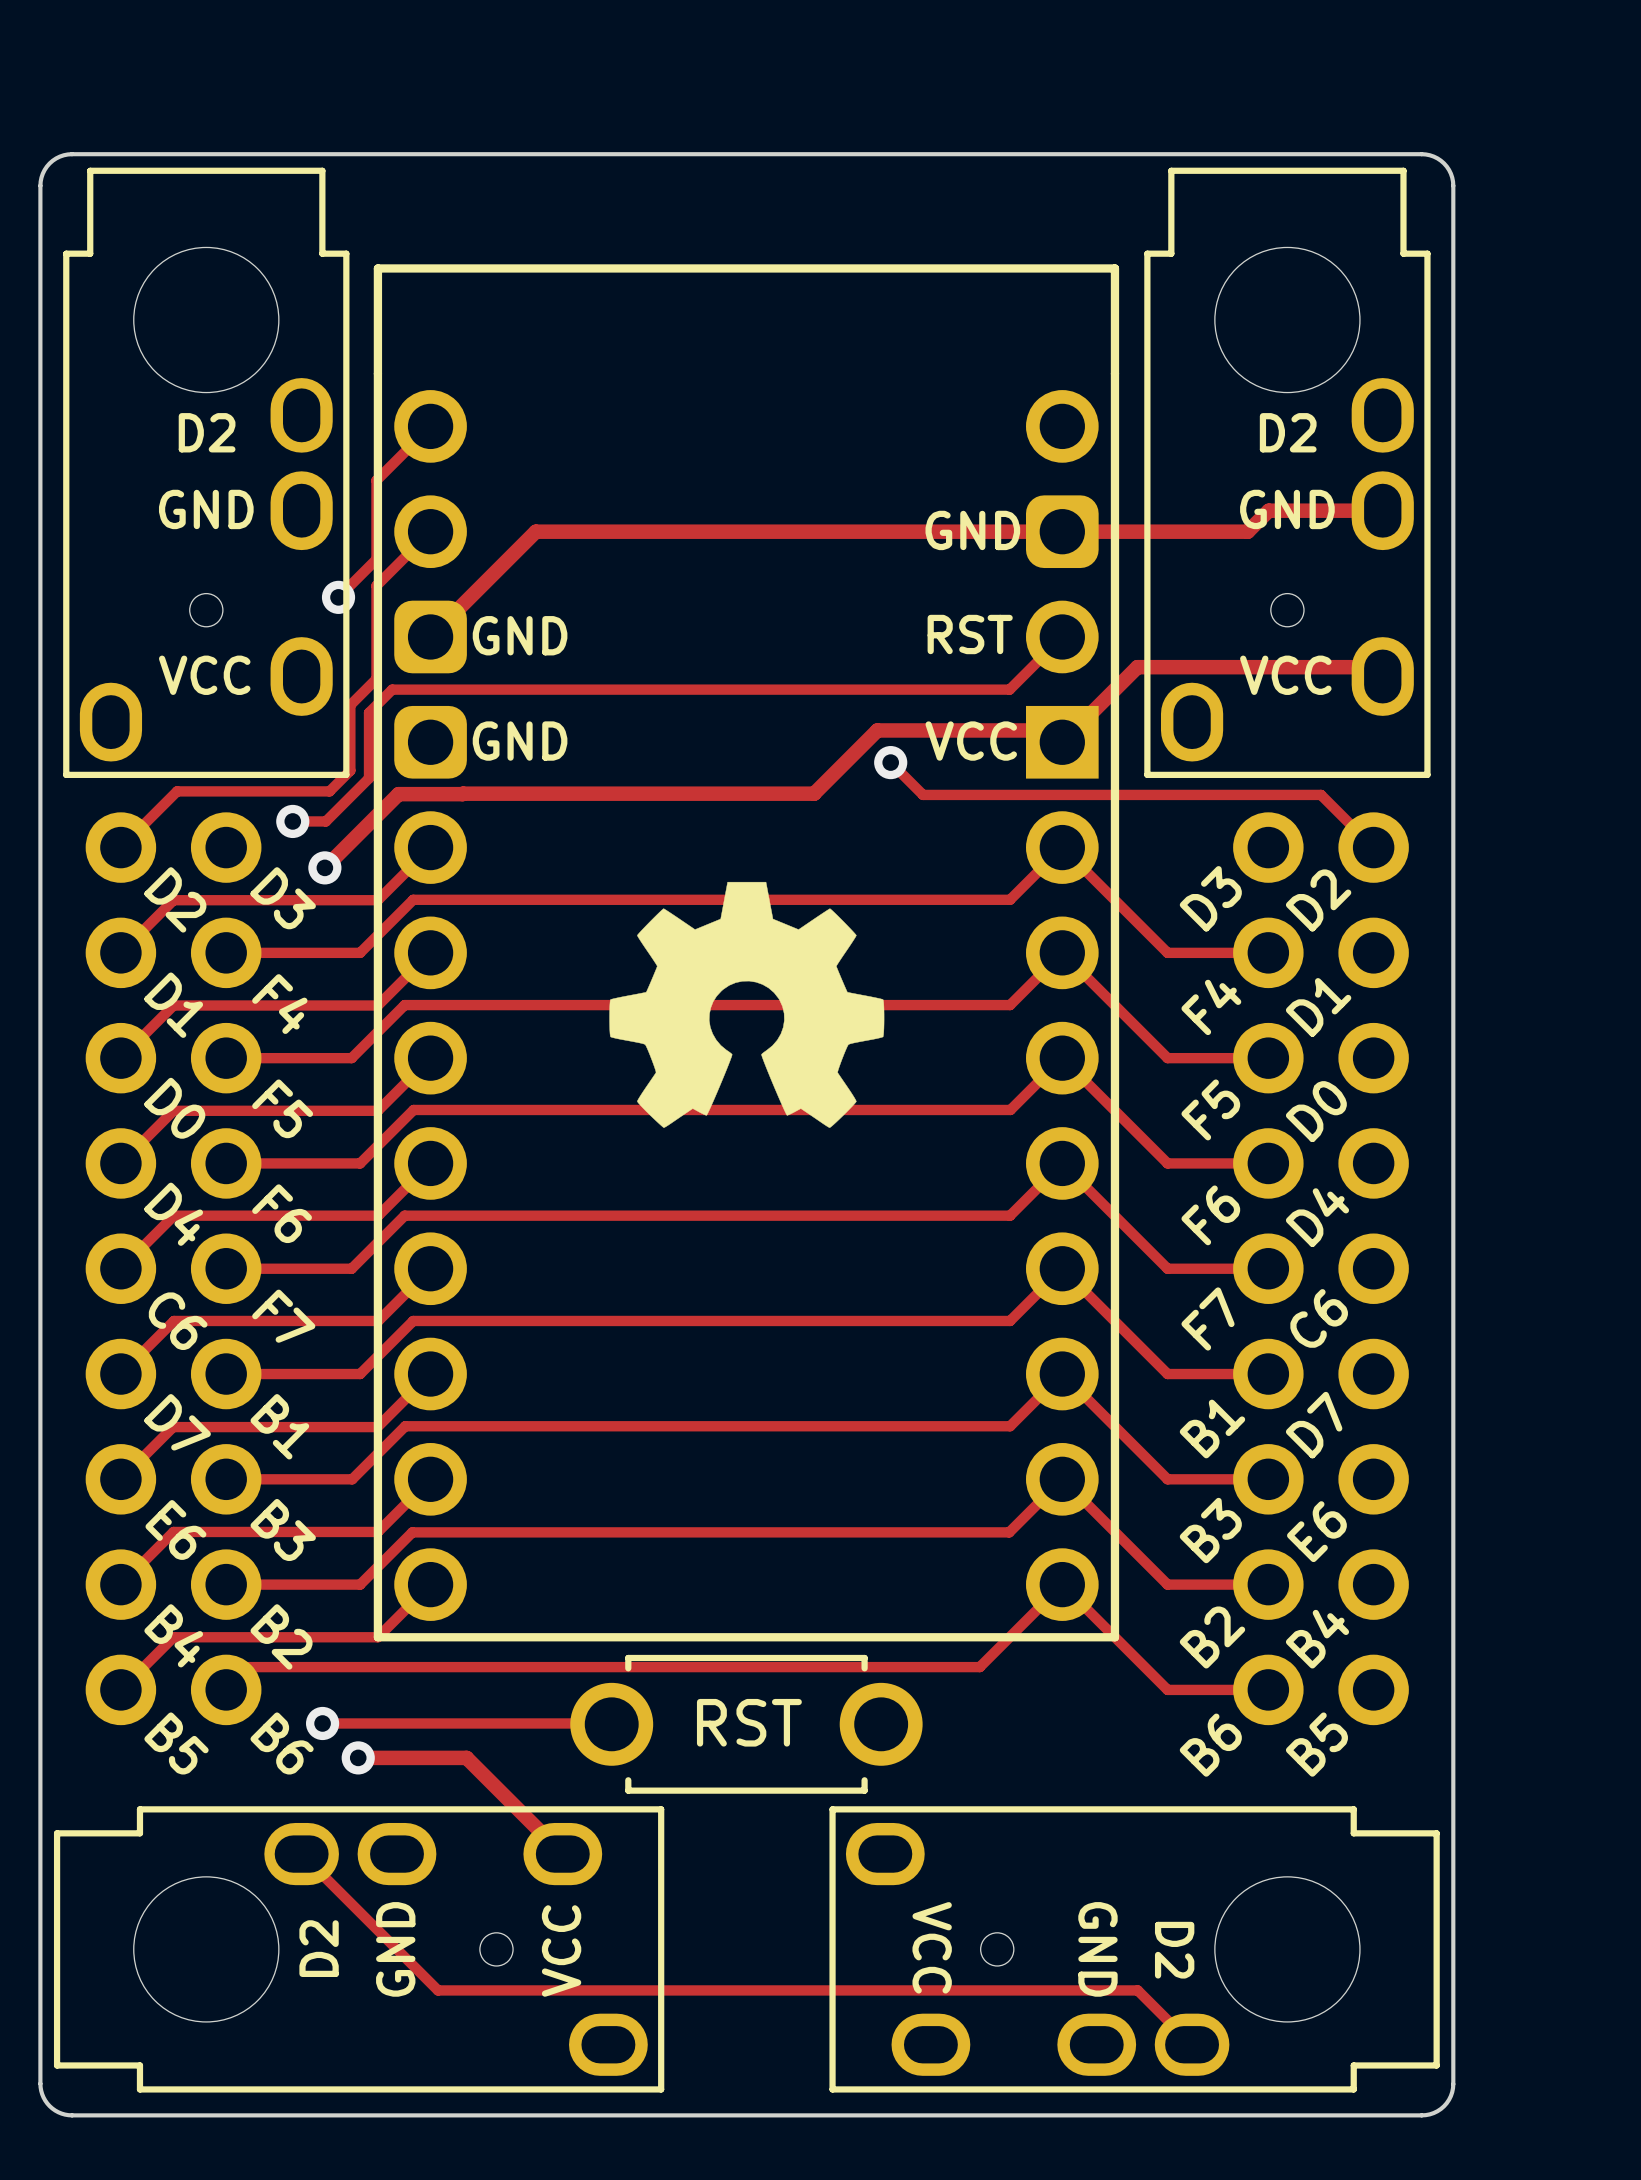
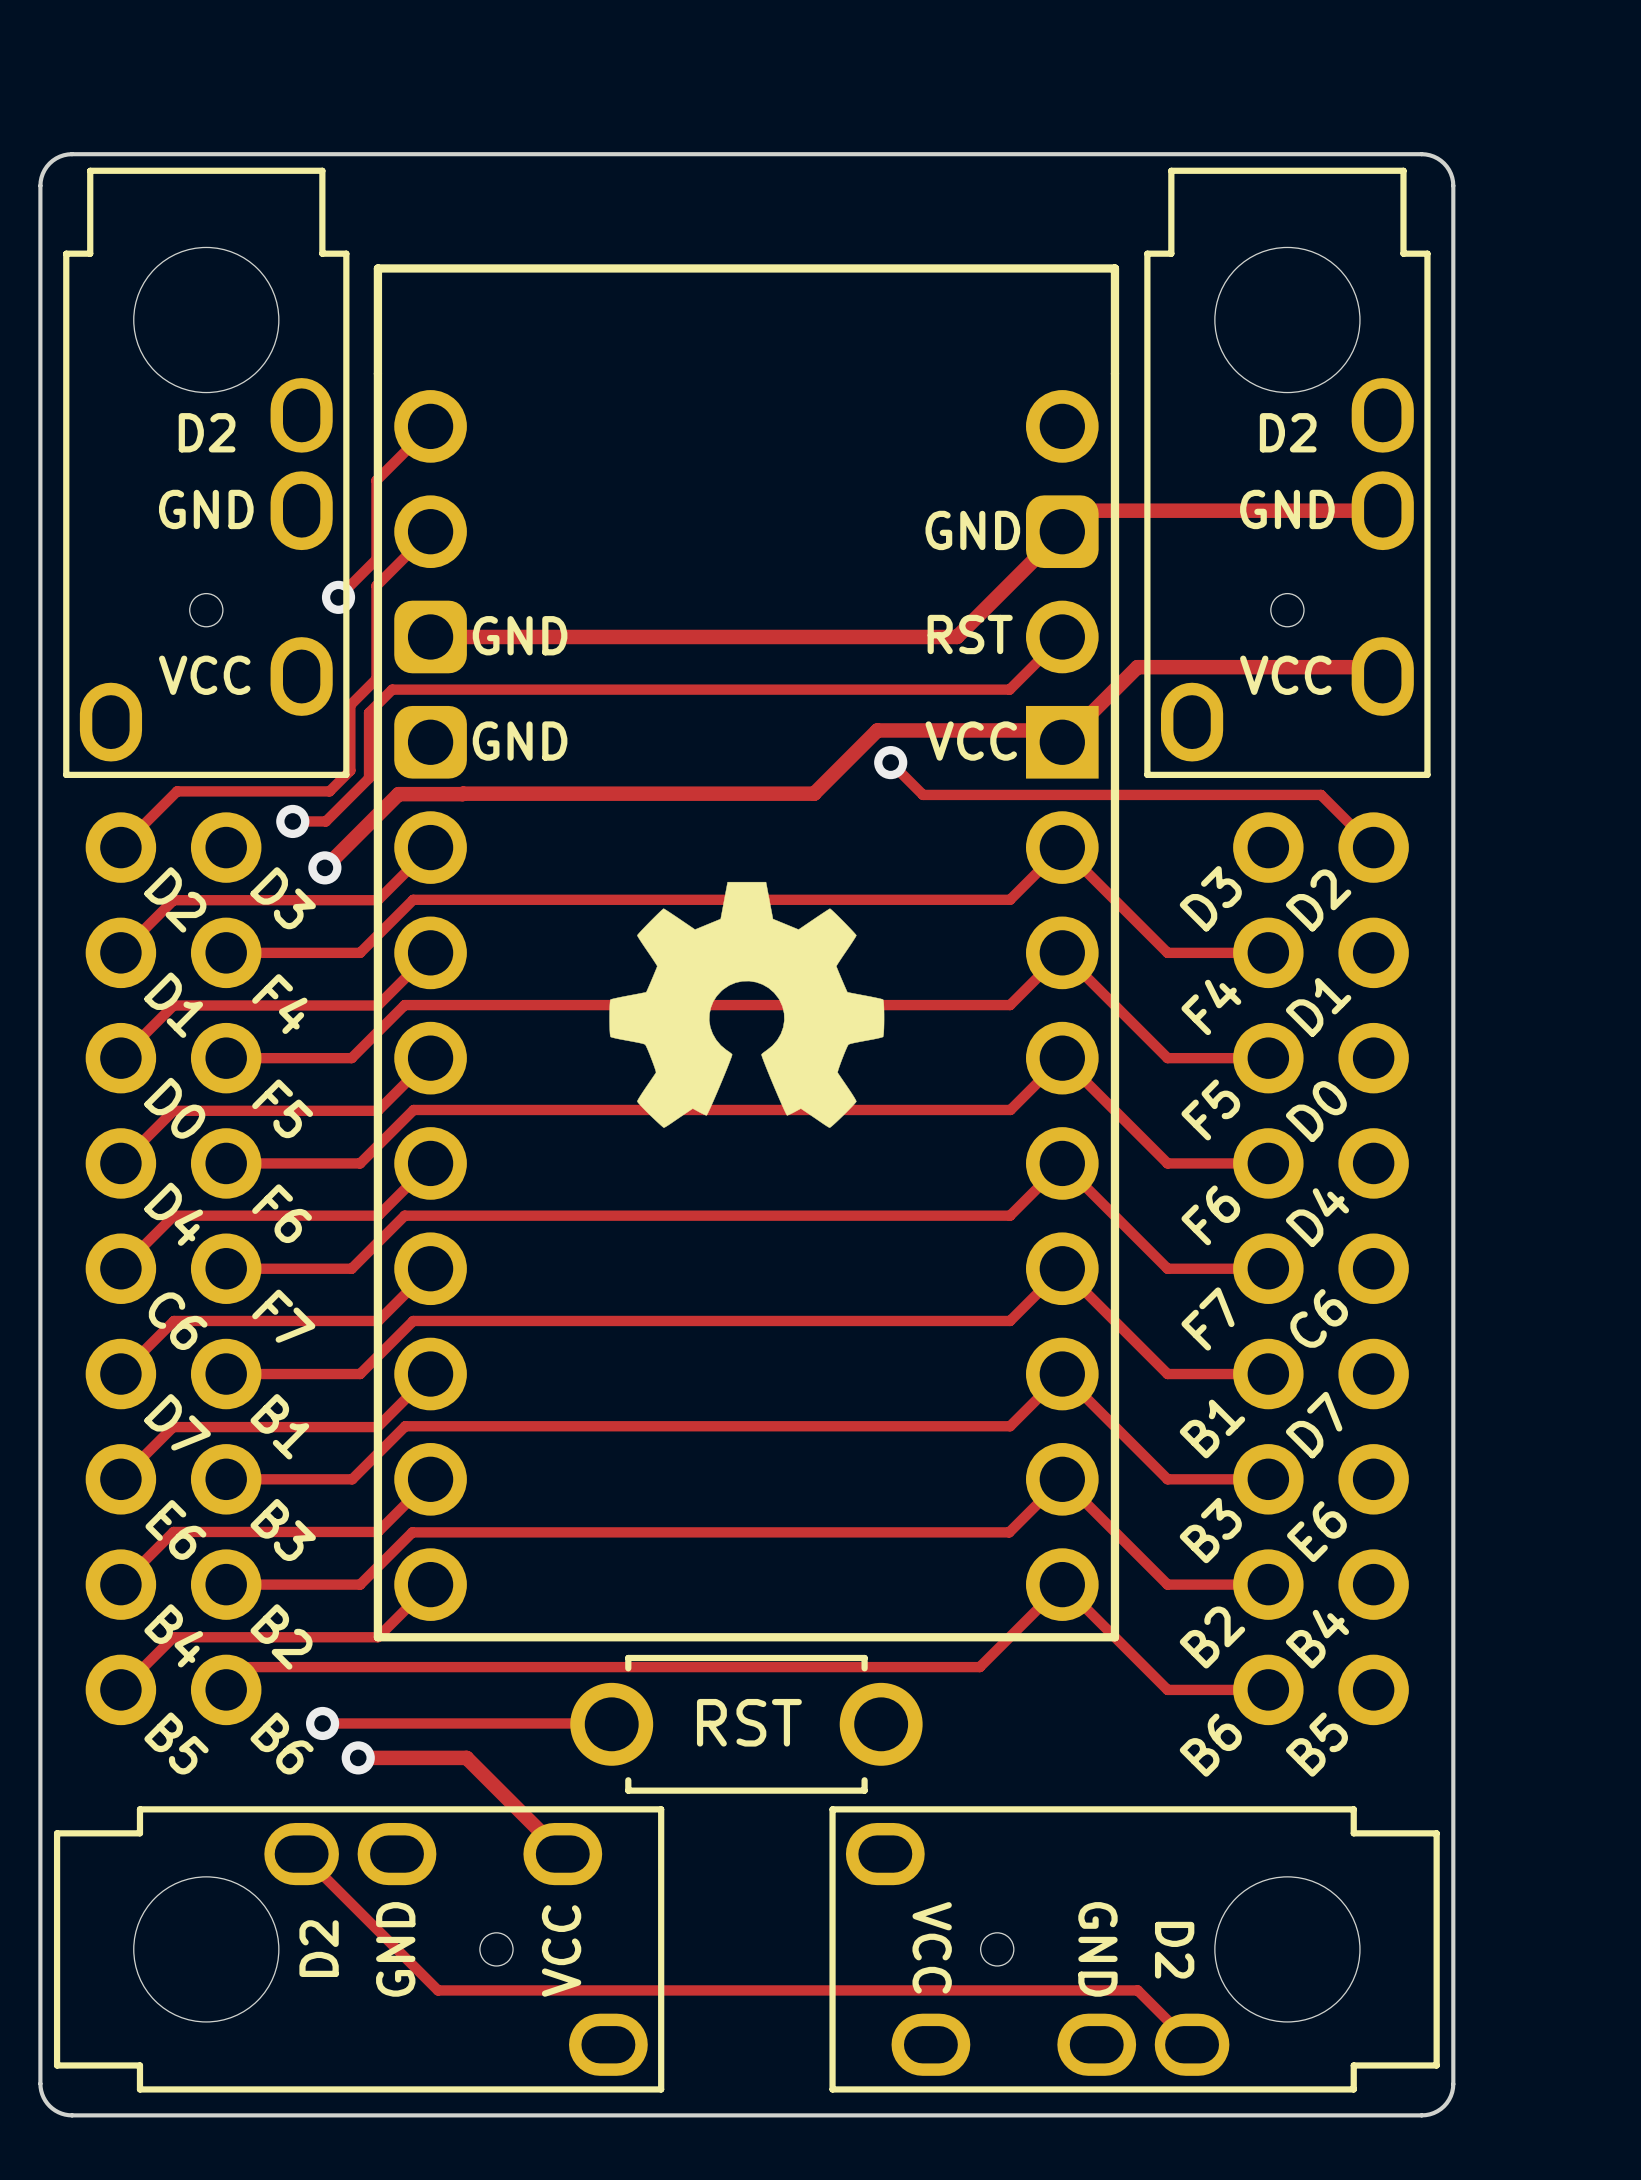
track: (1268, 510) (1247, 531) (535, 531) (430, 636) -> (1268, 510) (1083, 510) (957, 636) (430, 636)

